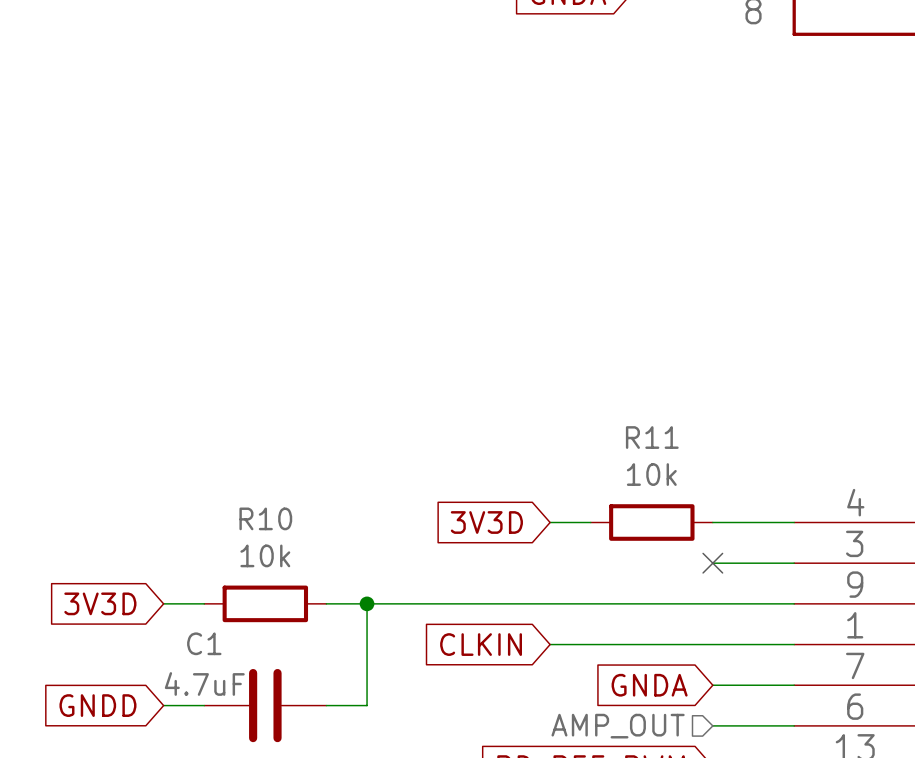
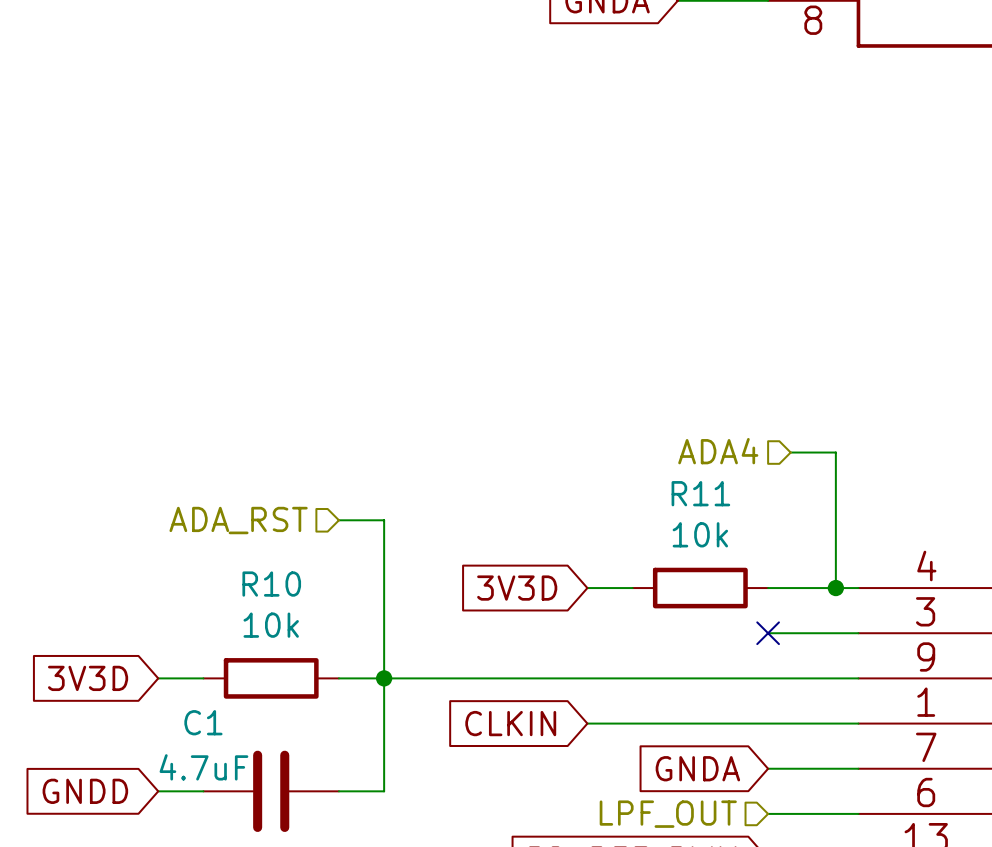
hierarchical label: none -> ADA4 (718, 451)
wire: none -> (790, 452) (835, 452) (835, 588)
hierarchical label: none -> ADA_RST (238, 520)
wire: none -> (338, 520) (384, 520) (384, 678)
junction: none -> (835, 588)
hierarchical label: AMP_OUT (618, 726) -> LPF_OUT (668, 814)

